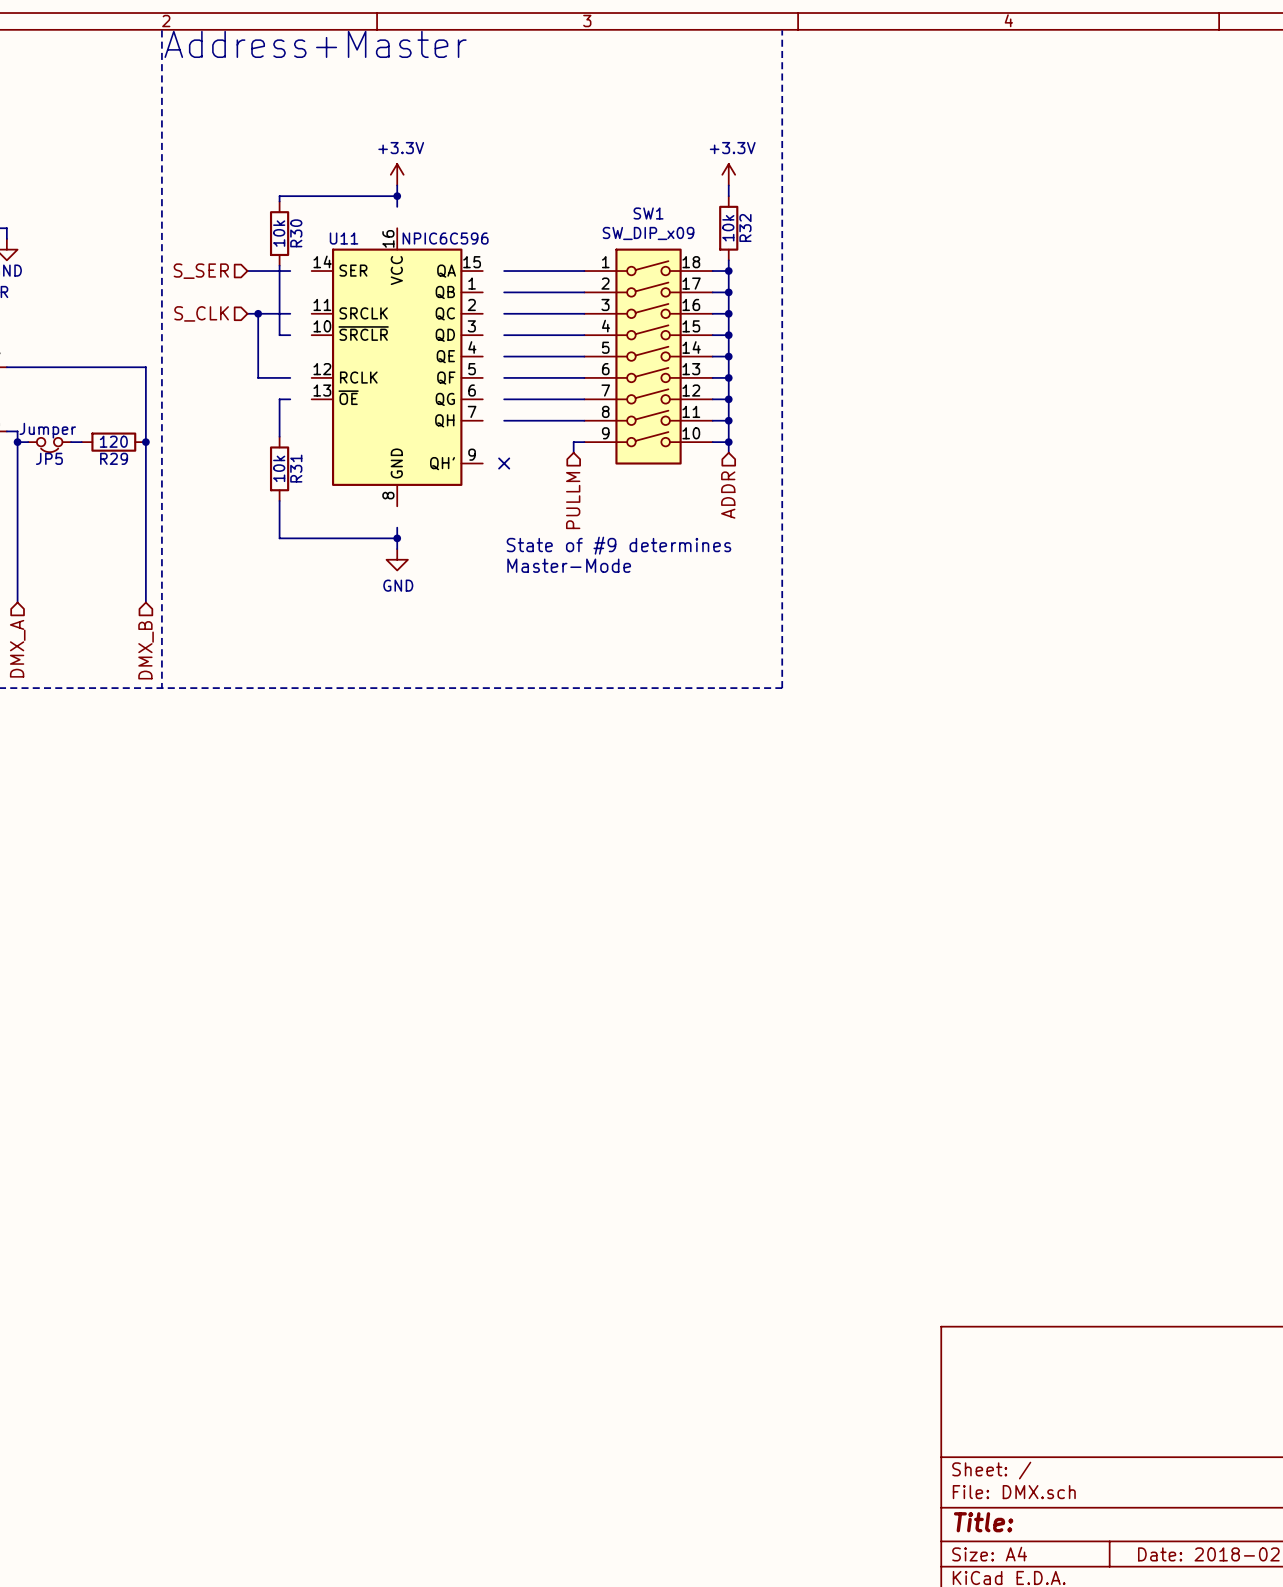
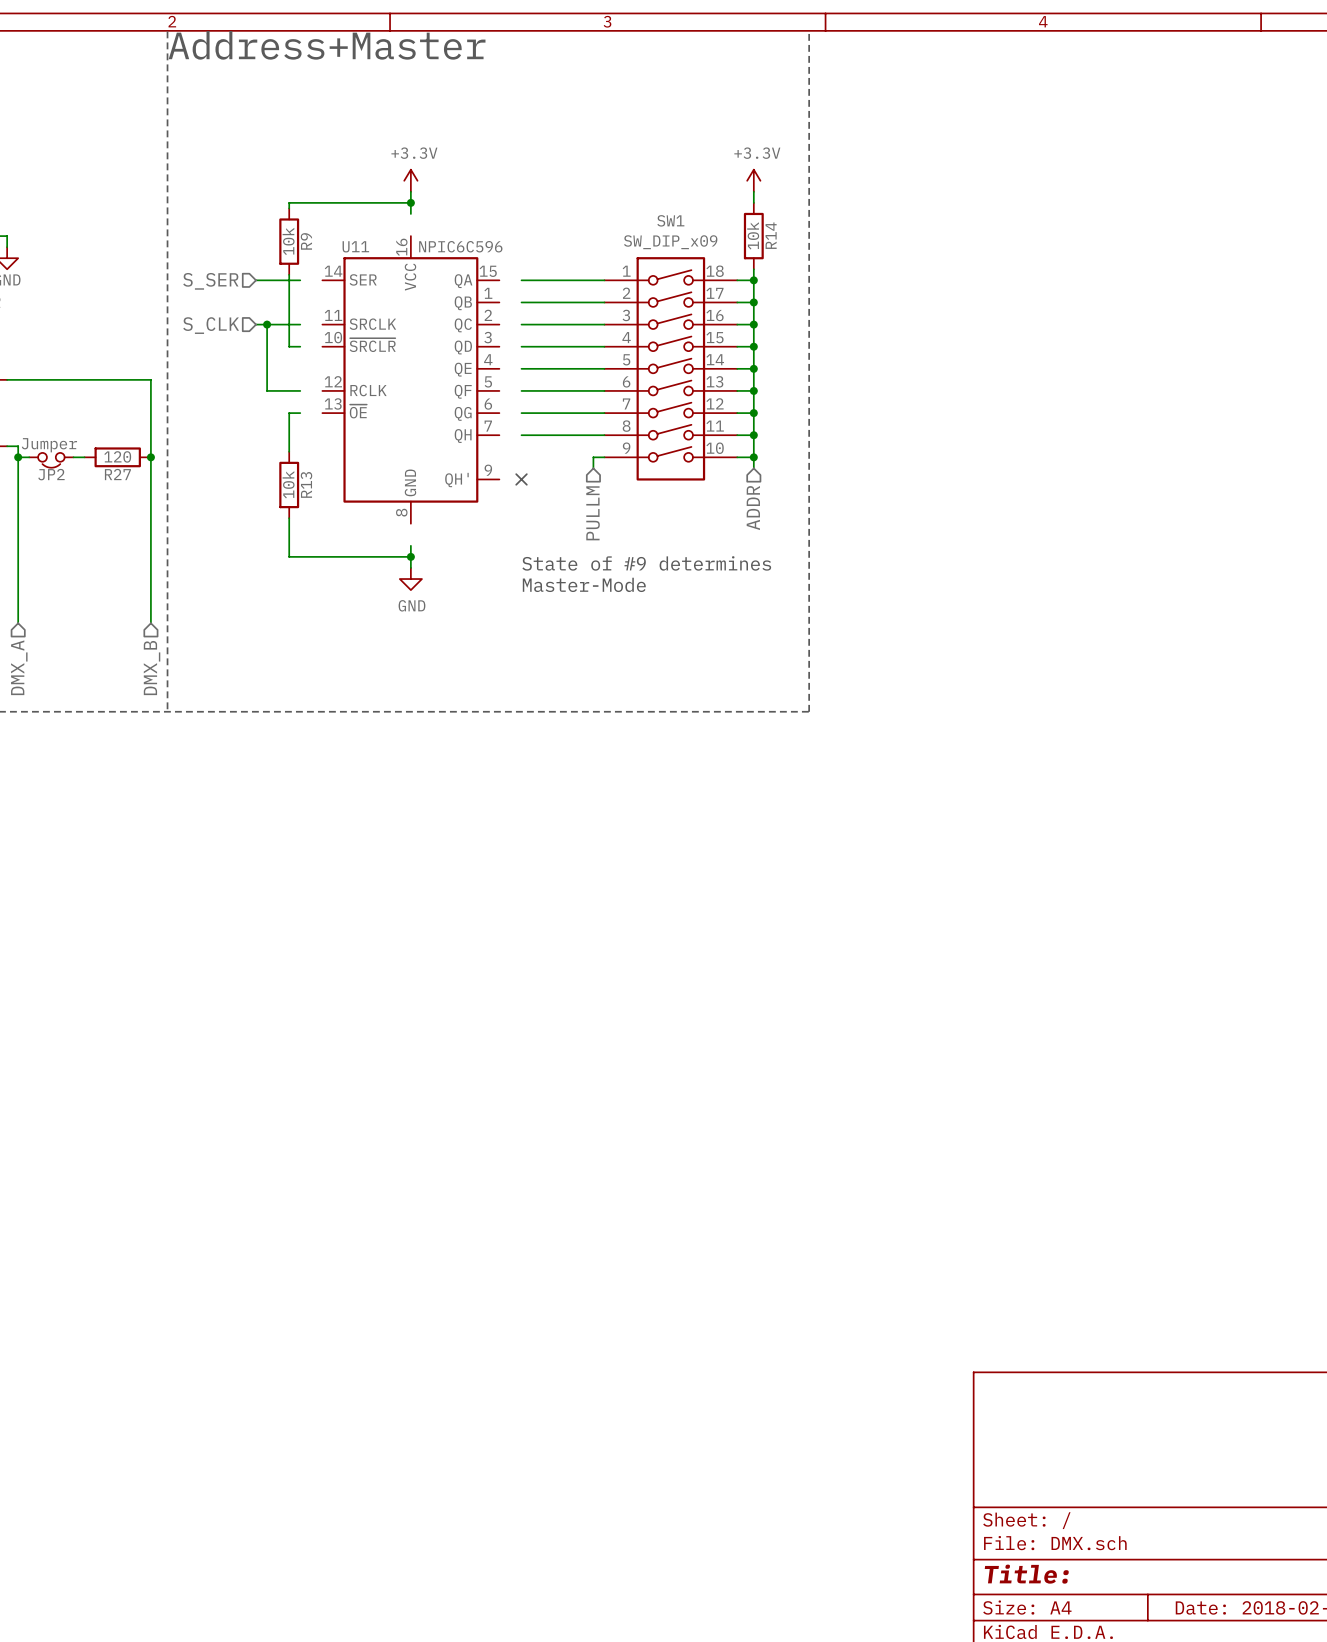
R32 name: R32 (745, 227) -> R14 (771, 235)
R30 name: R30 (296, 233) -> R9 (306, 241)
JP5 name: JP5 (49, 458) -> JP2 (51, 474)
R29 name: R29 (114, 458) -> R27 (117, 474)
R31 name: R31 (296, 468) -> R13 (306, 484)

